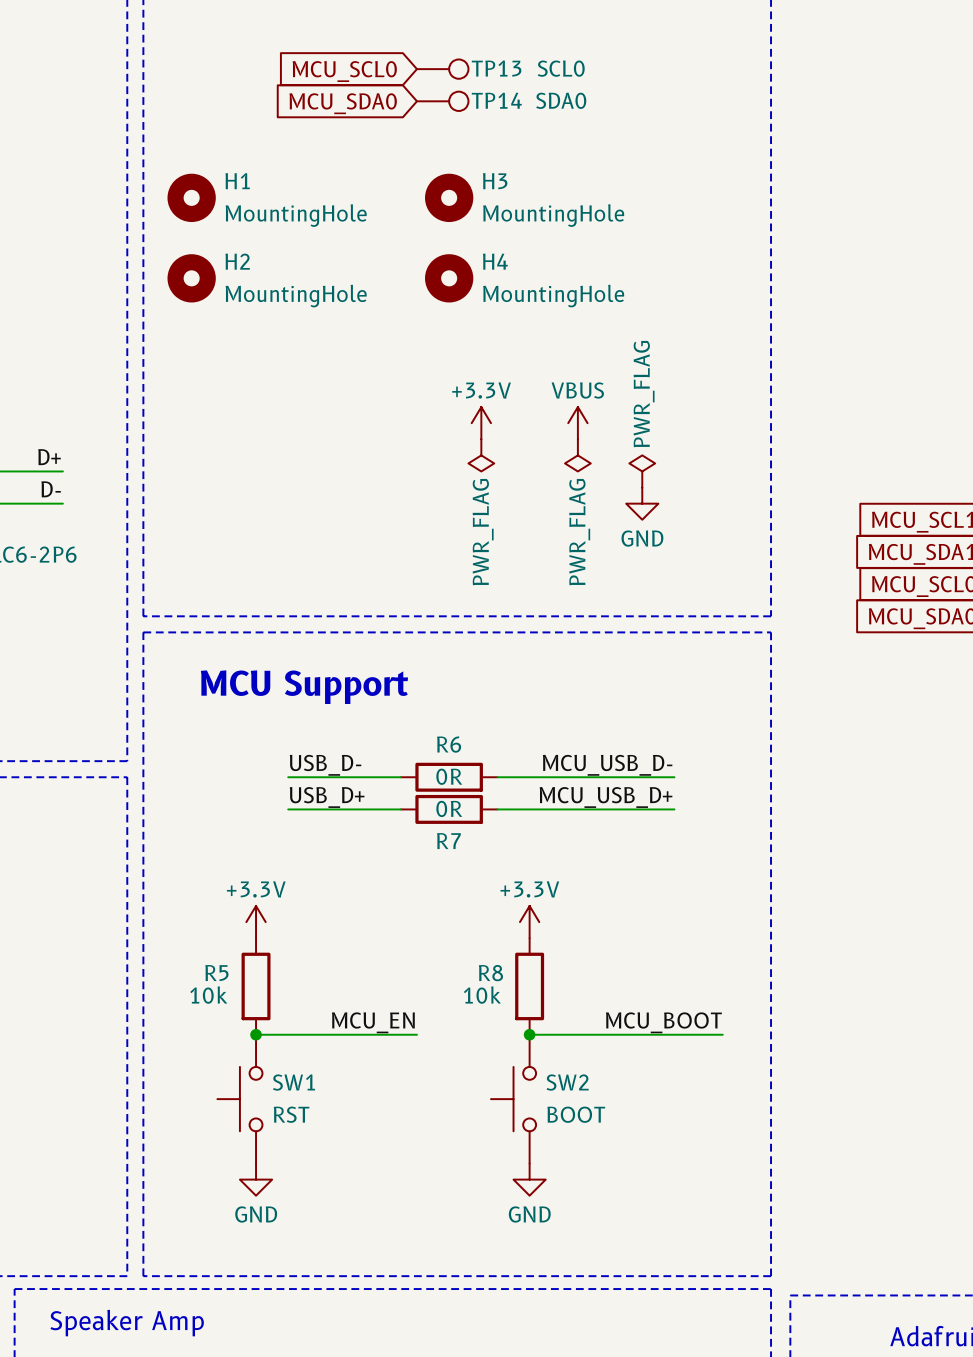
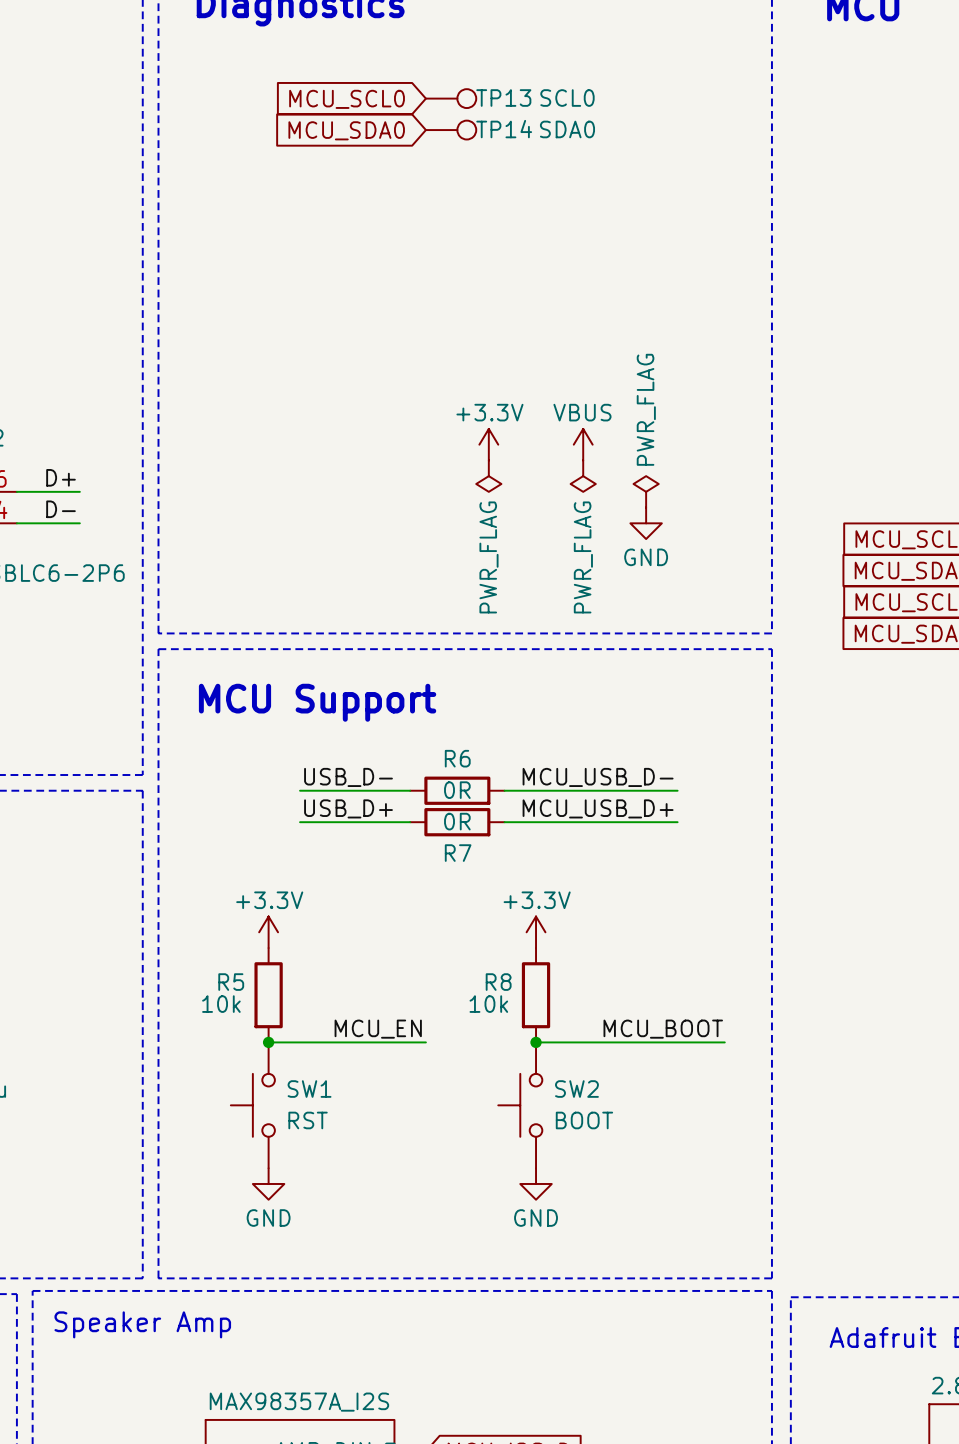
H1: MountingHole (191, 197) -> none
H3: MountingHole (449, 197) -> none
H2: MountingHole (191, 278) -> none
H4: MountingHole (449, 278) -> none

